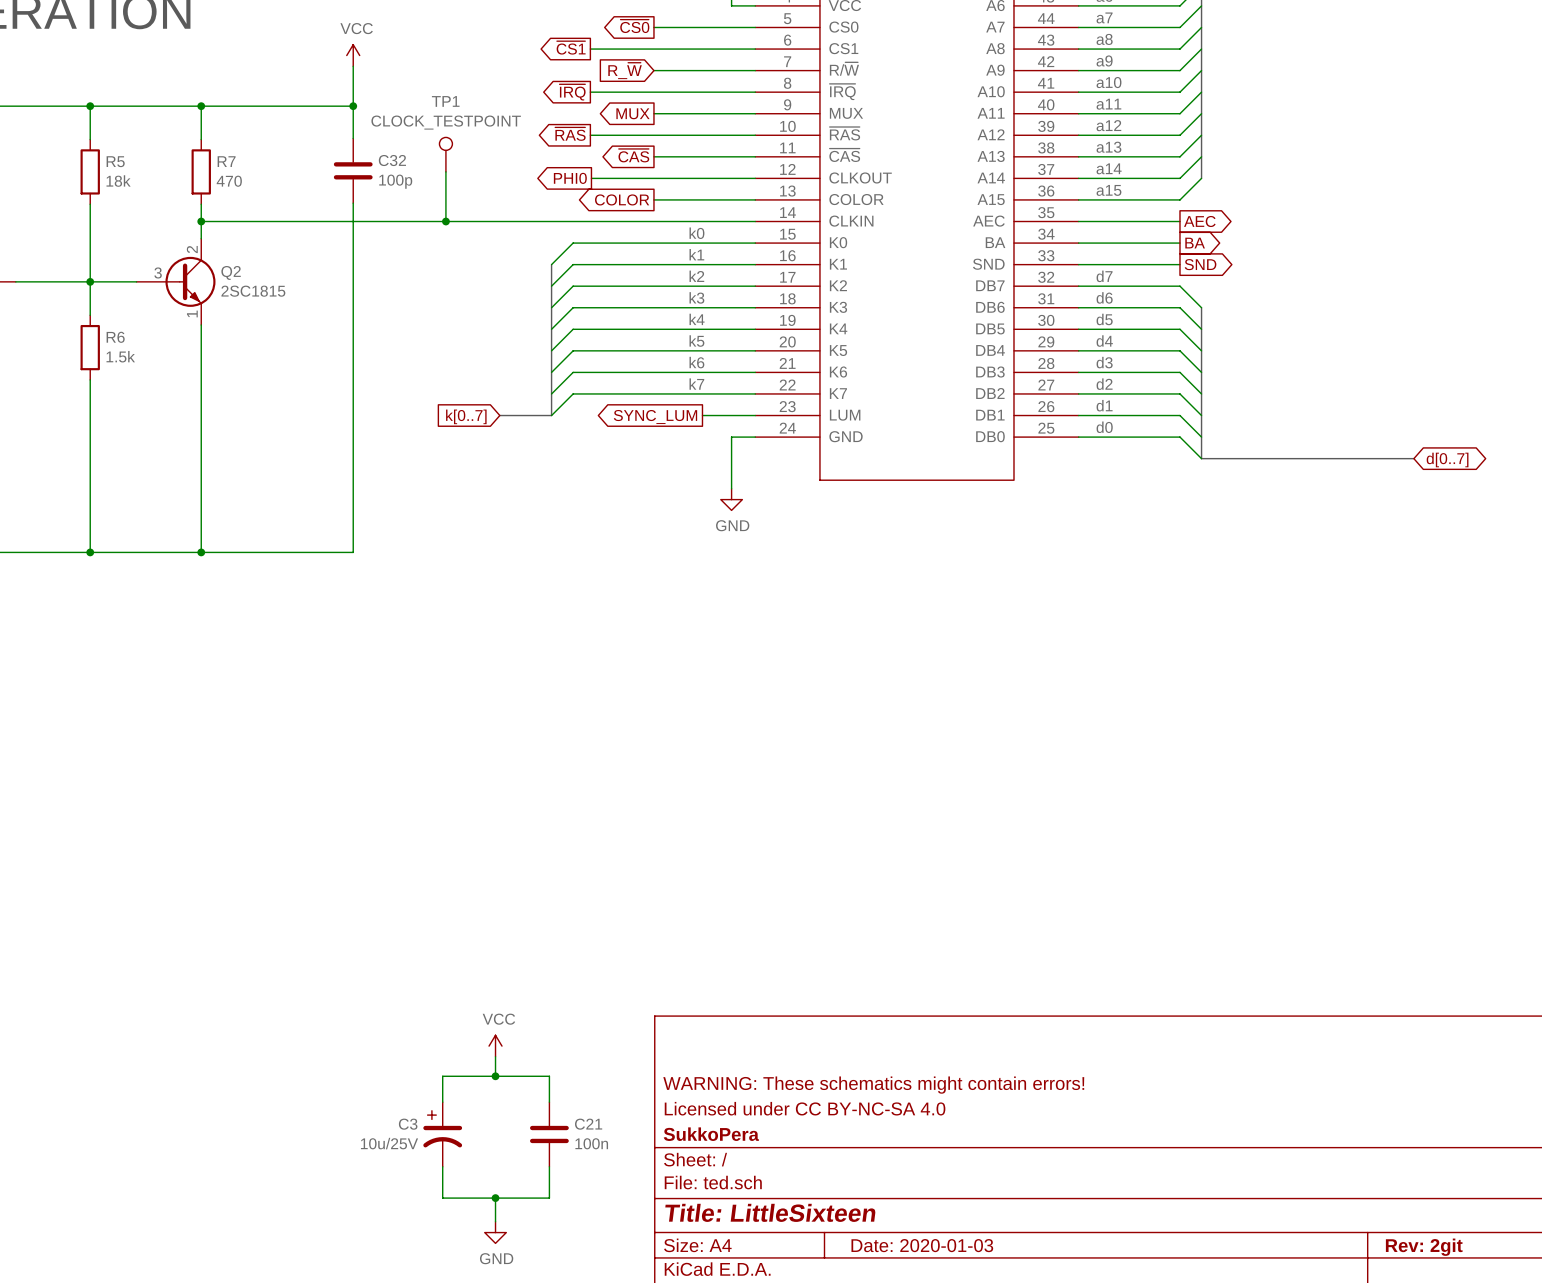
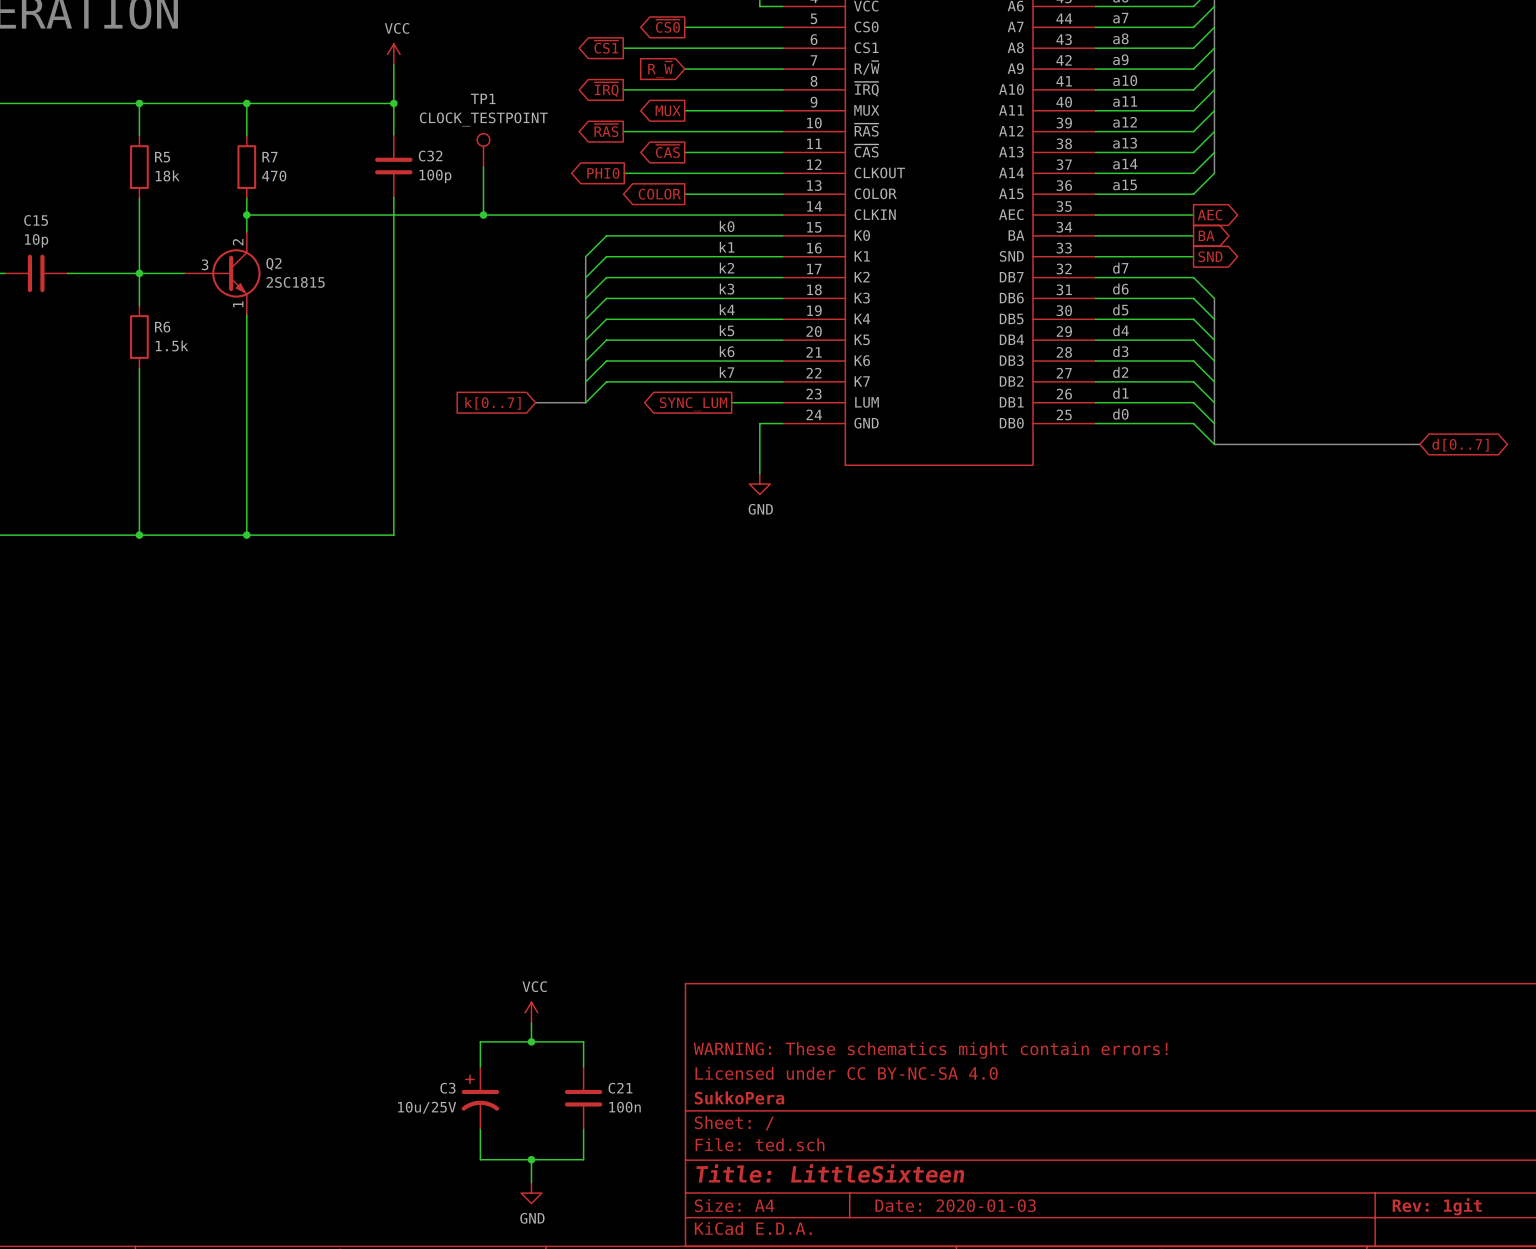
title block: Rev: 2git (1424, 1247) -> Rev: 1git (1437, 1206)

